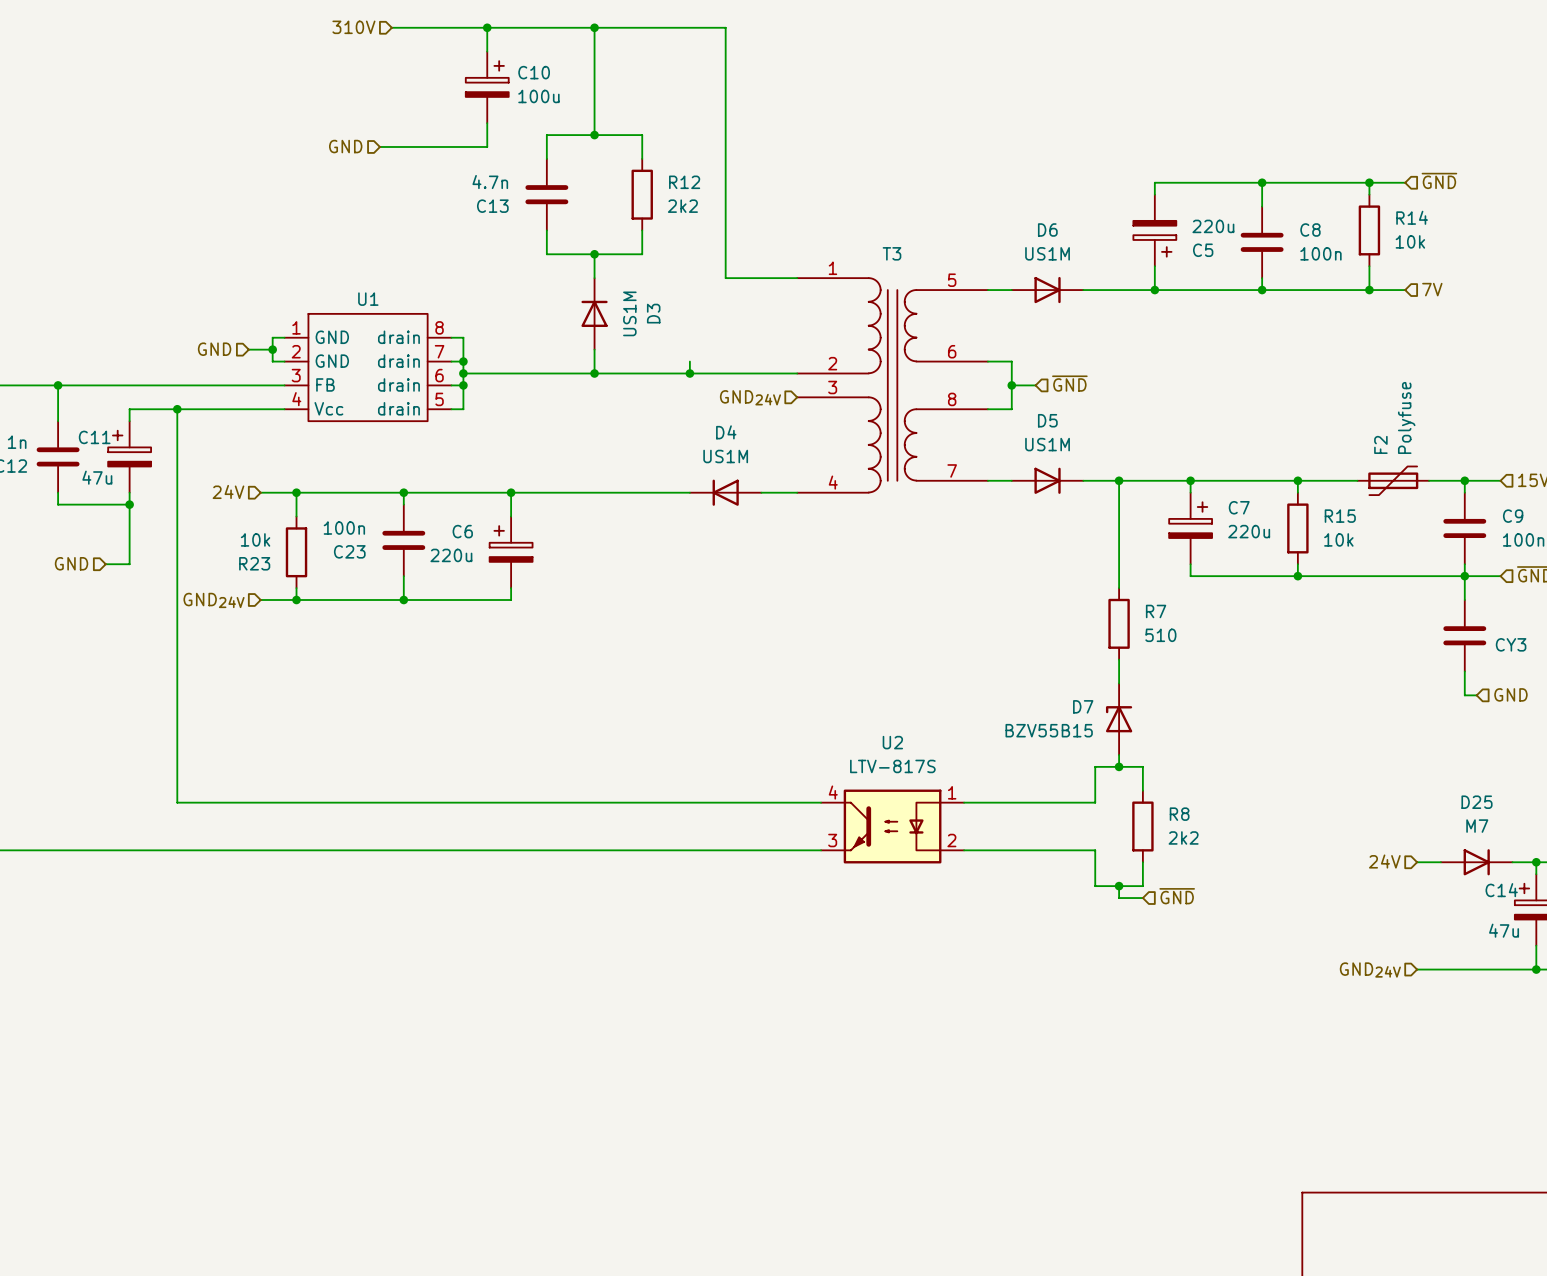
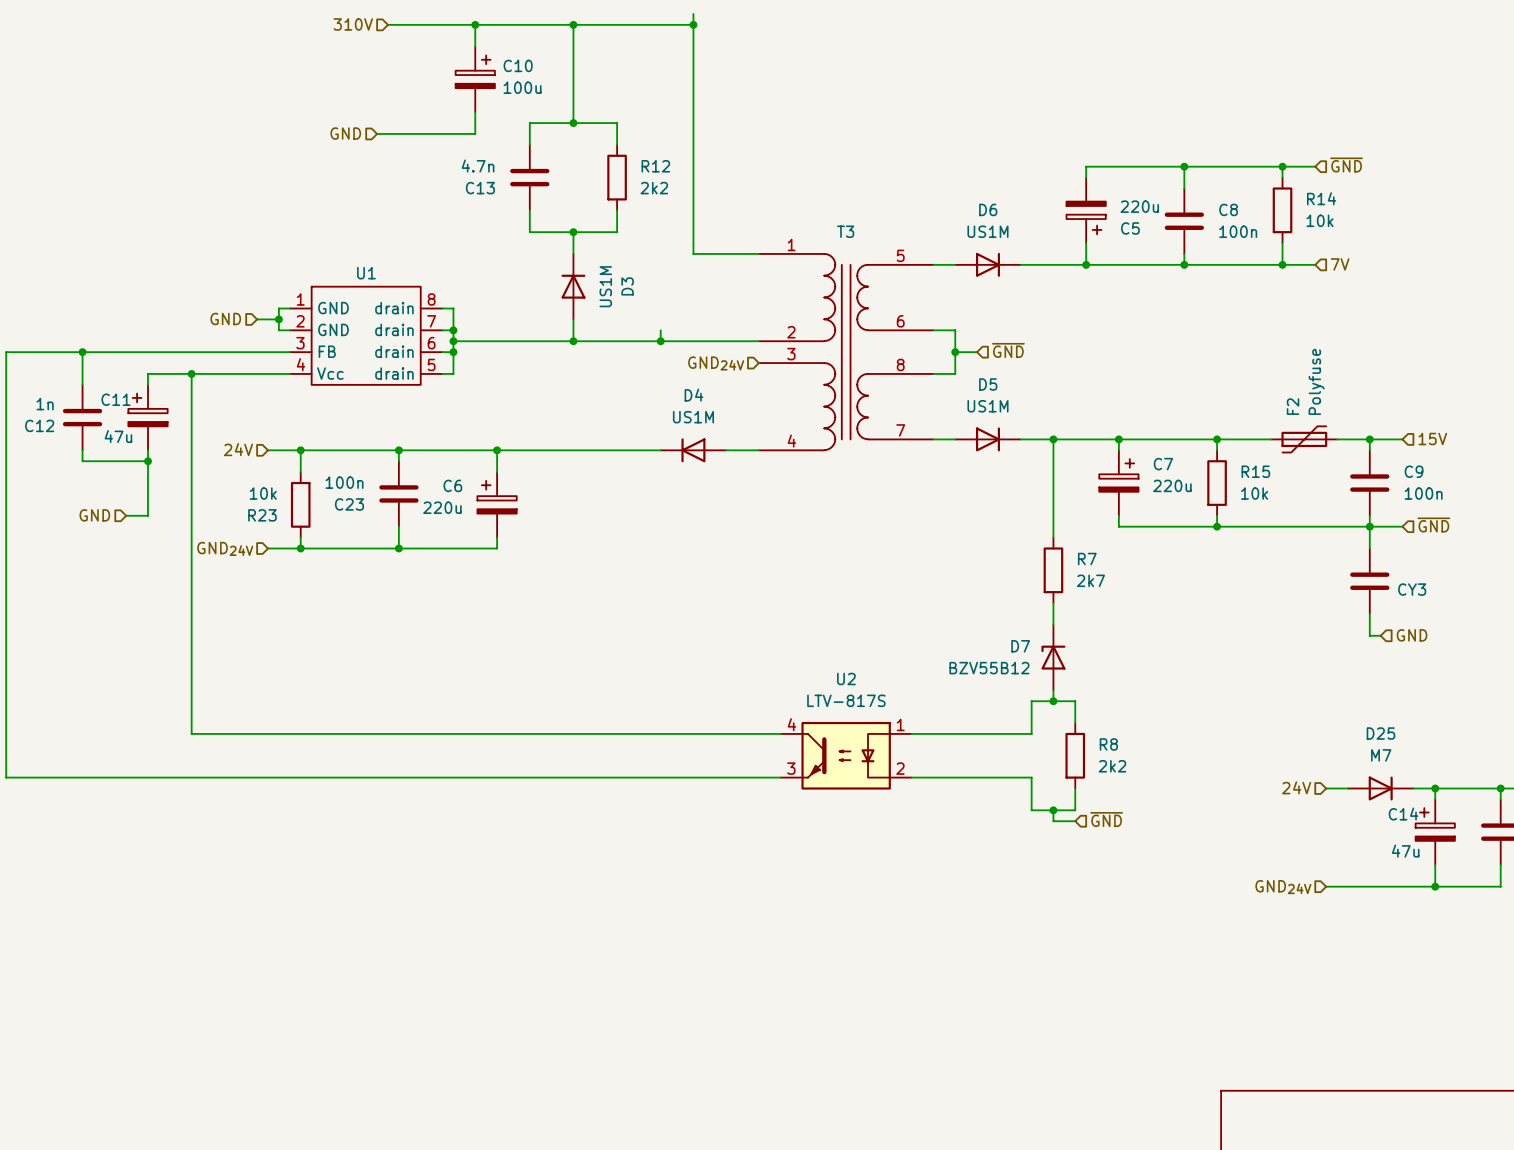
wire: none -> (693, 13) (693, 24)
junction: none -> (693, 24)
R7 value: 510 (1160, 635) -> 2k7 (1090, 580)
D7 value: BZV55B15 (1049, 730) -> BZV55B12 (989, 668)

